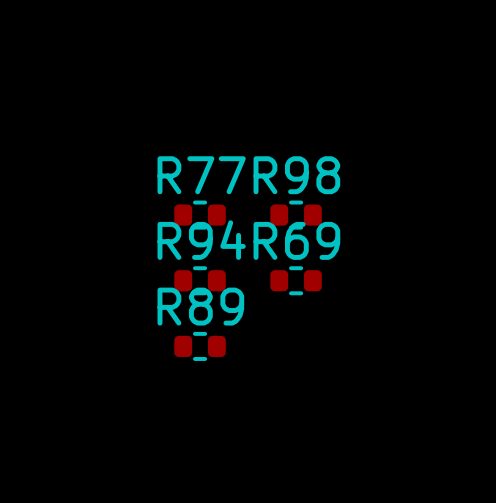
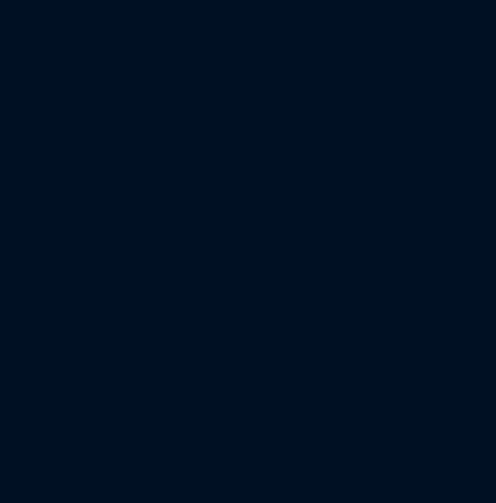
R77: (200, 215) -> none
R98: (296, 215) -> none
R94: (200, 280) -> none
R69: (296, 280) -> none
R89: (200, 346) -> none

